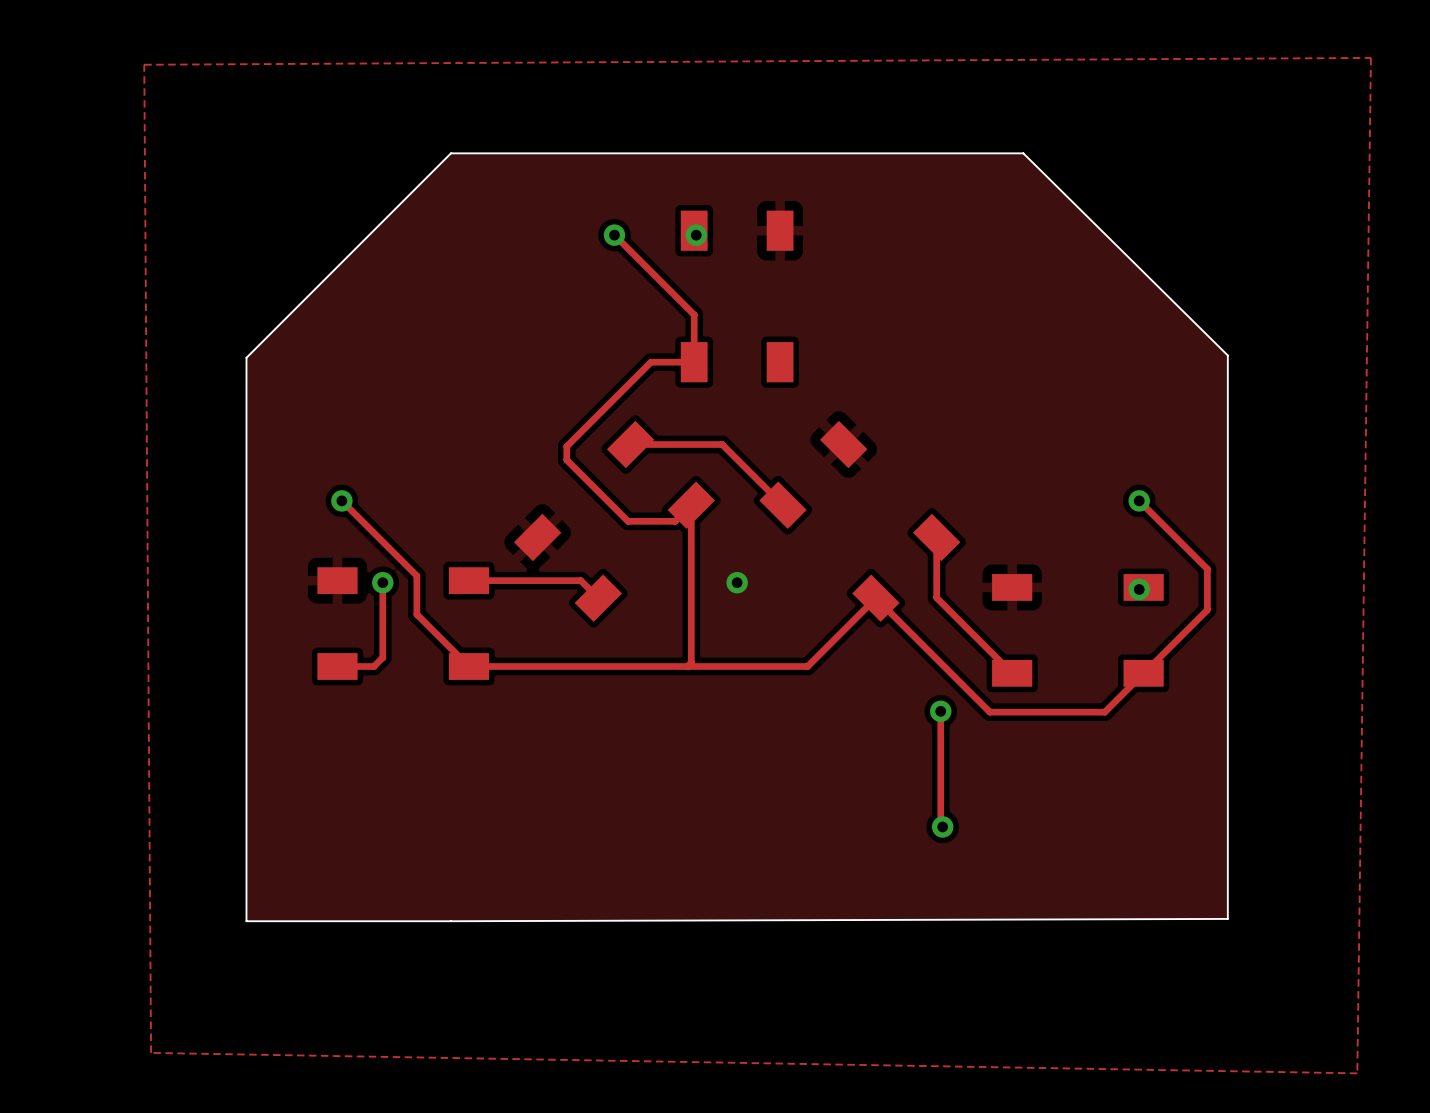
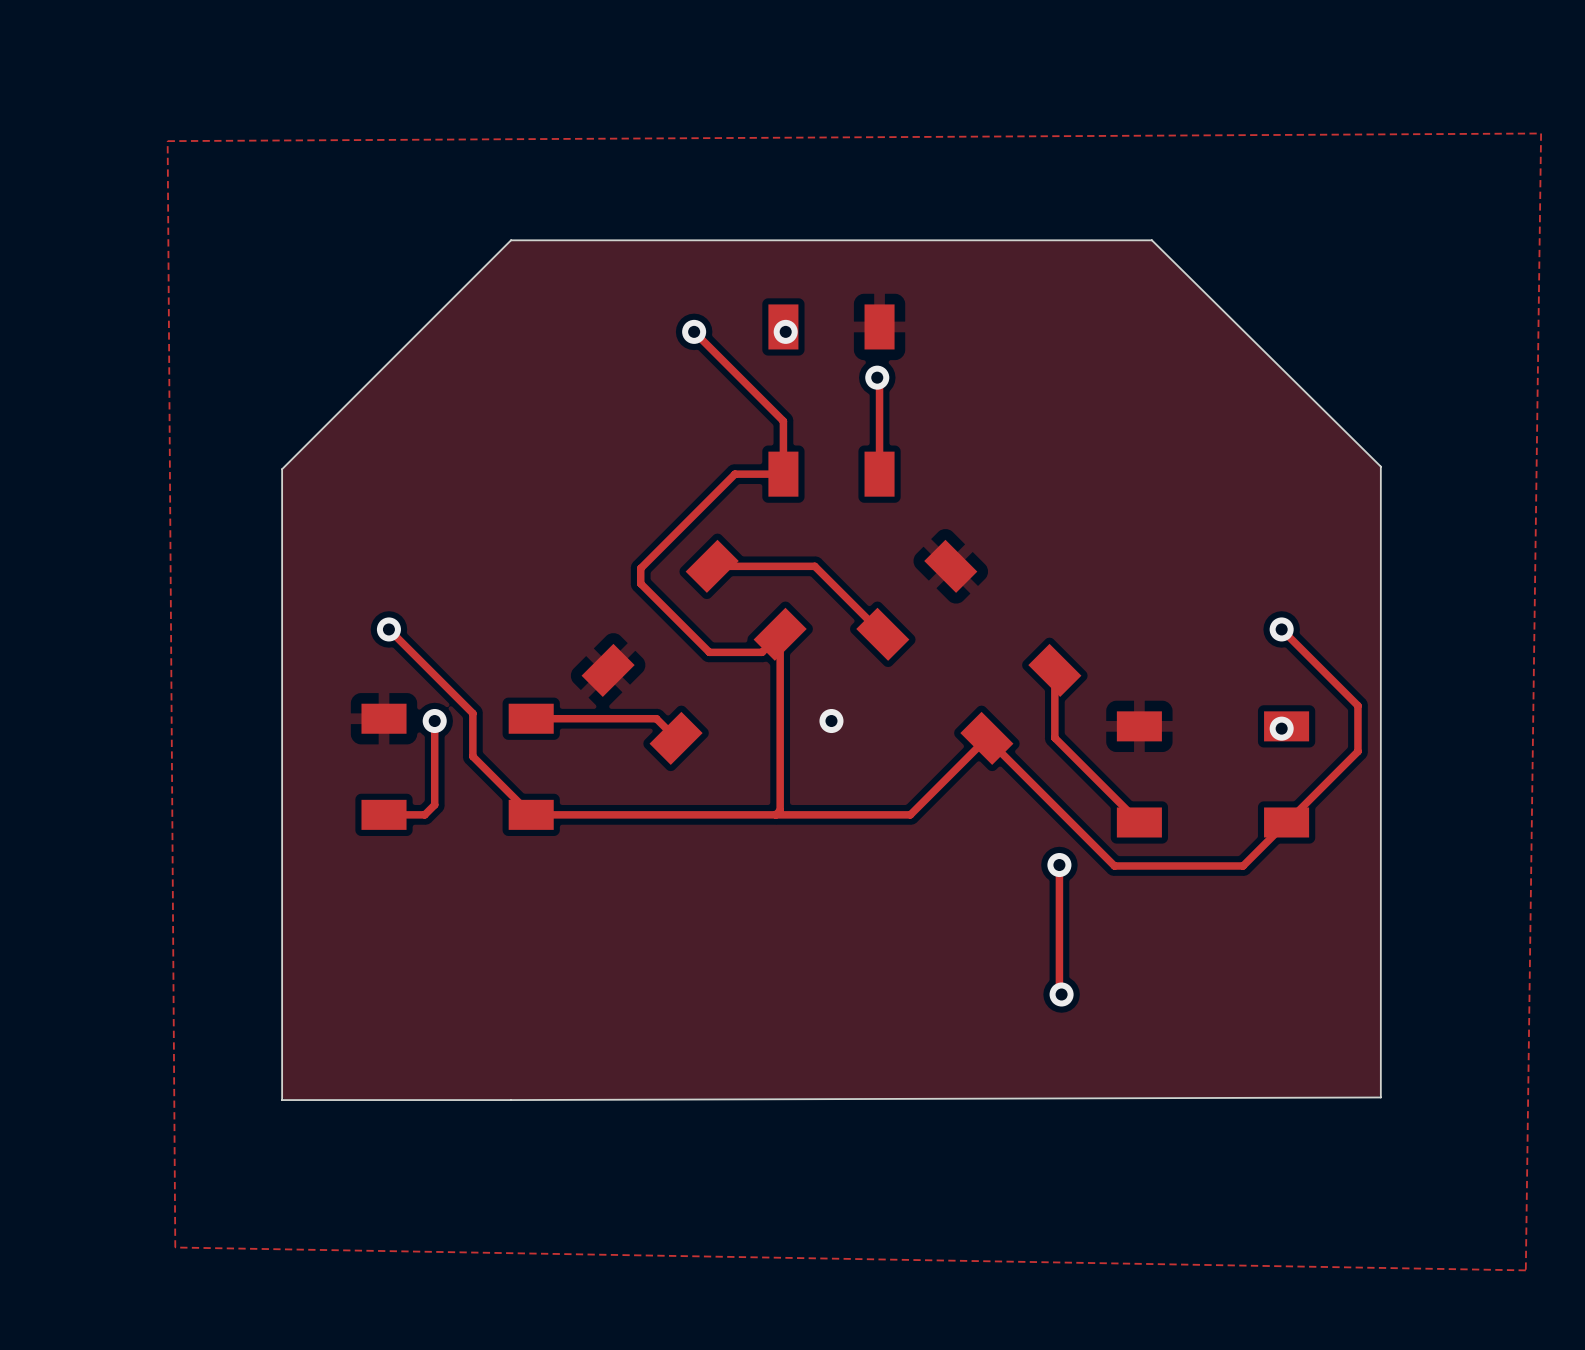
track: none -> (877, 377) (879, 379) (879, 474)
via: none -> (877, 377)

